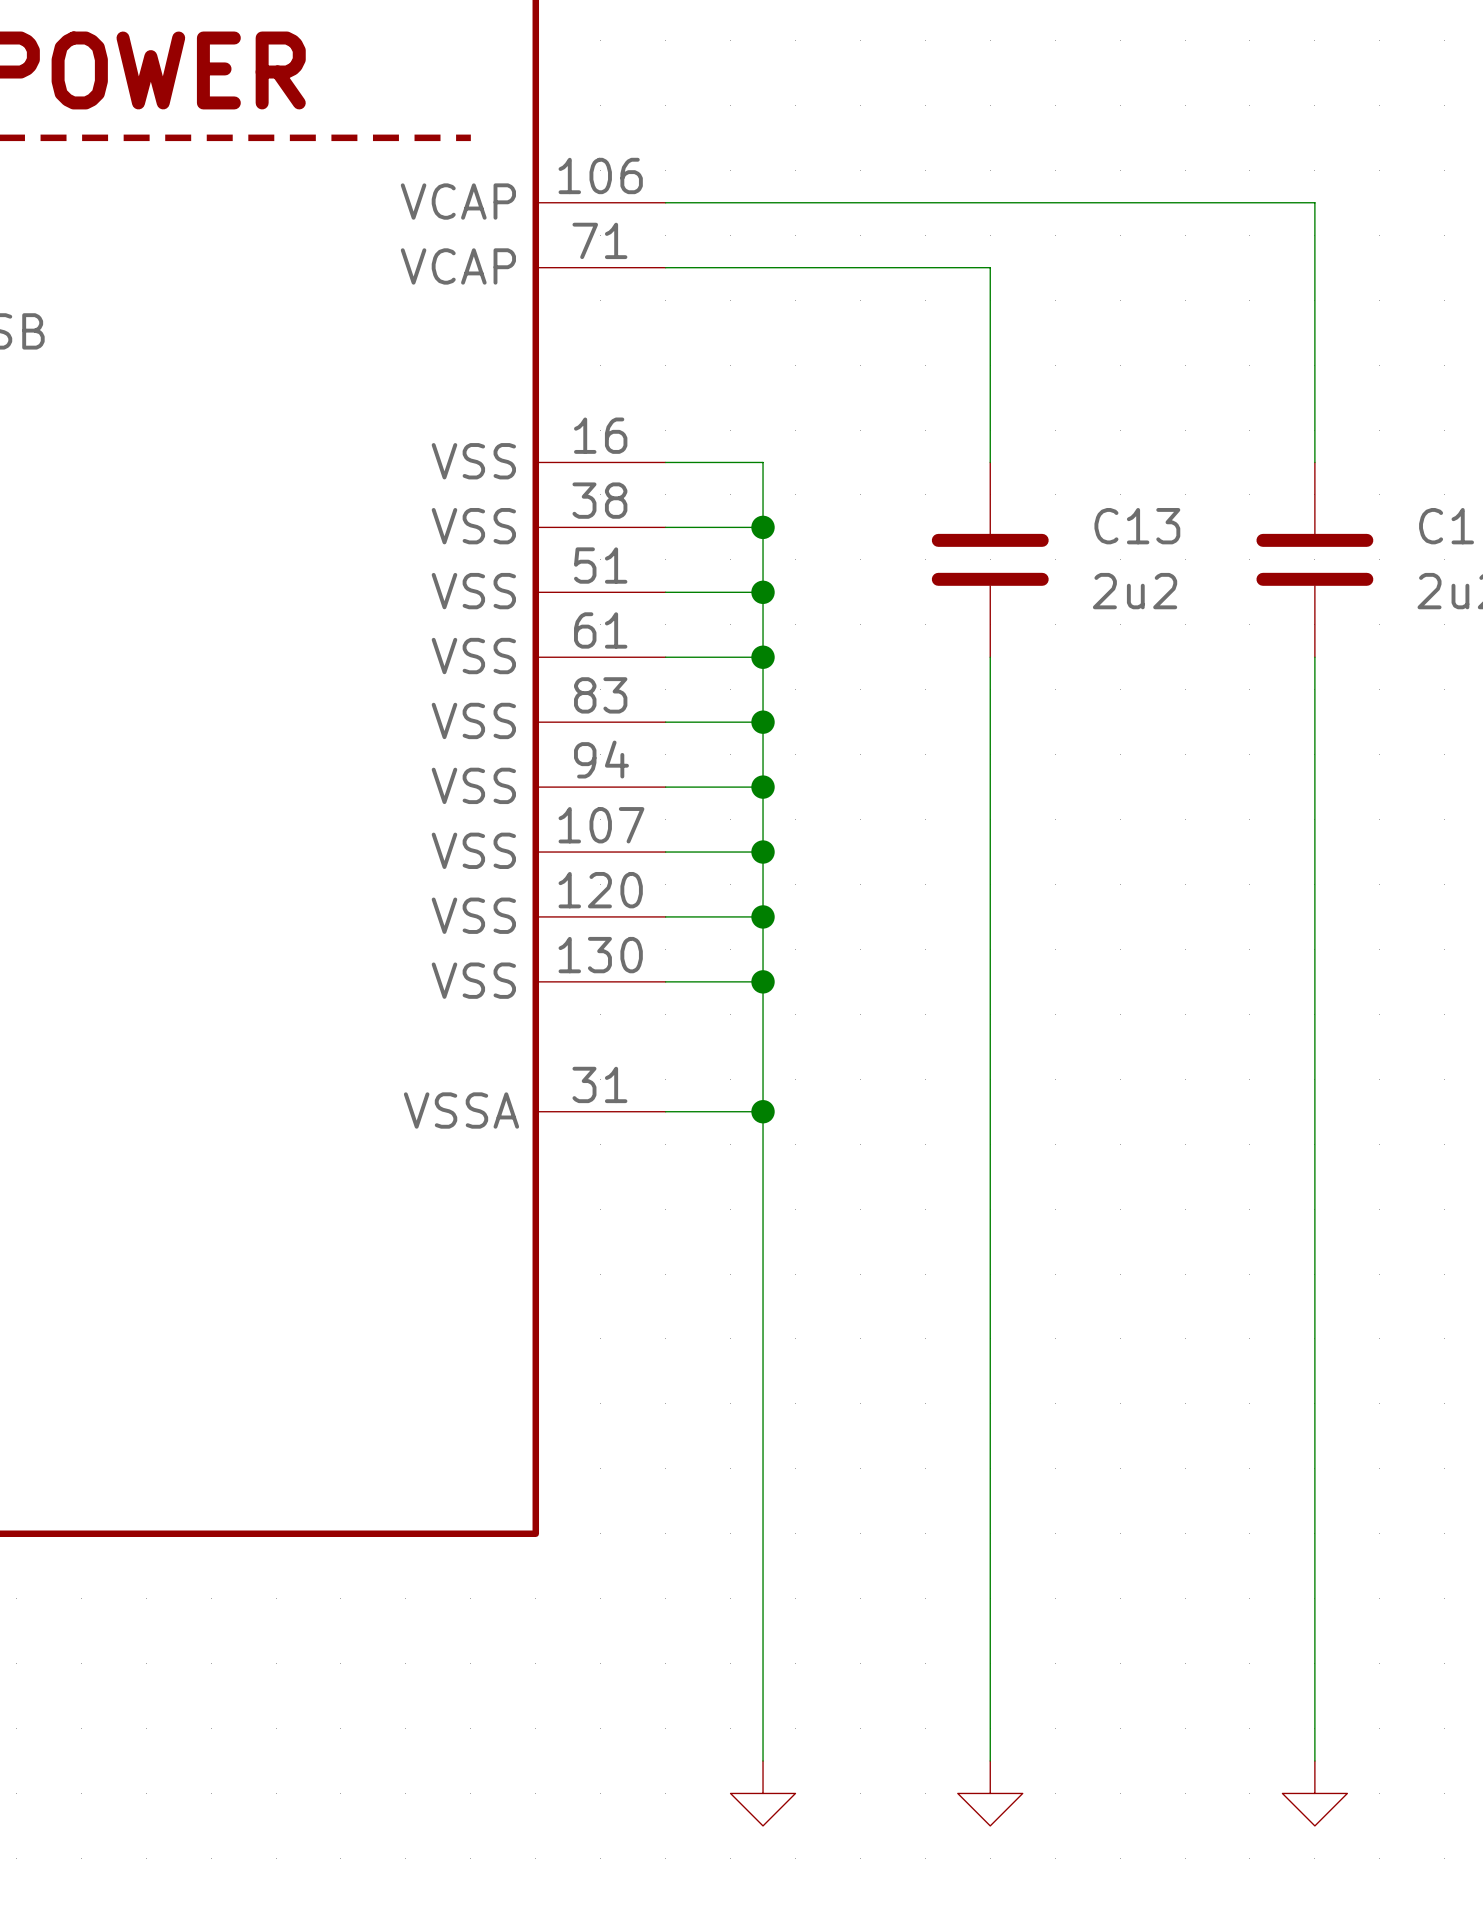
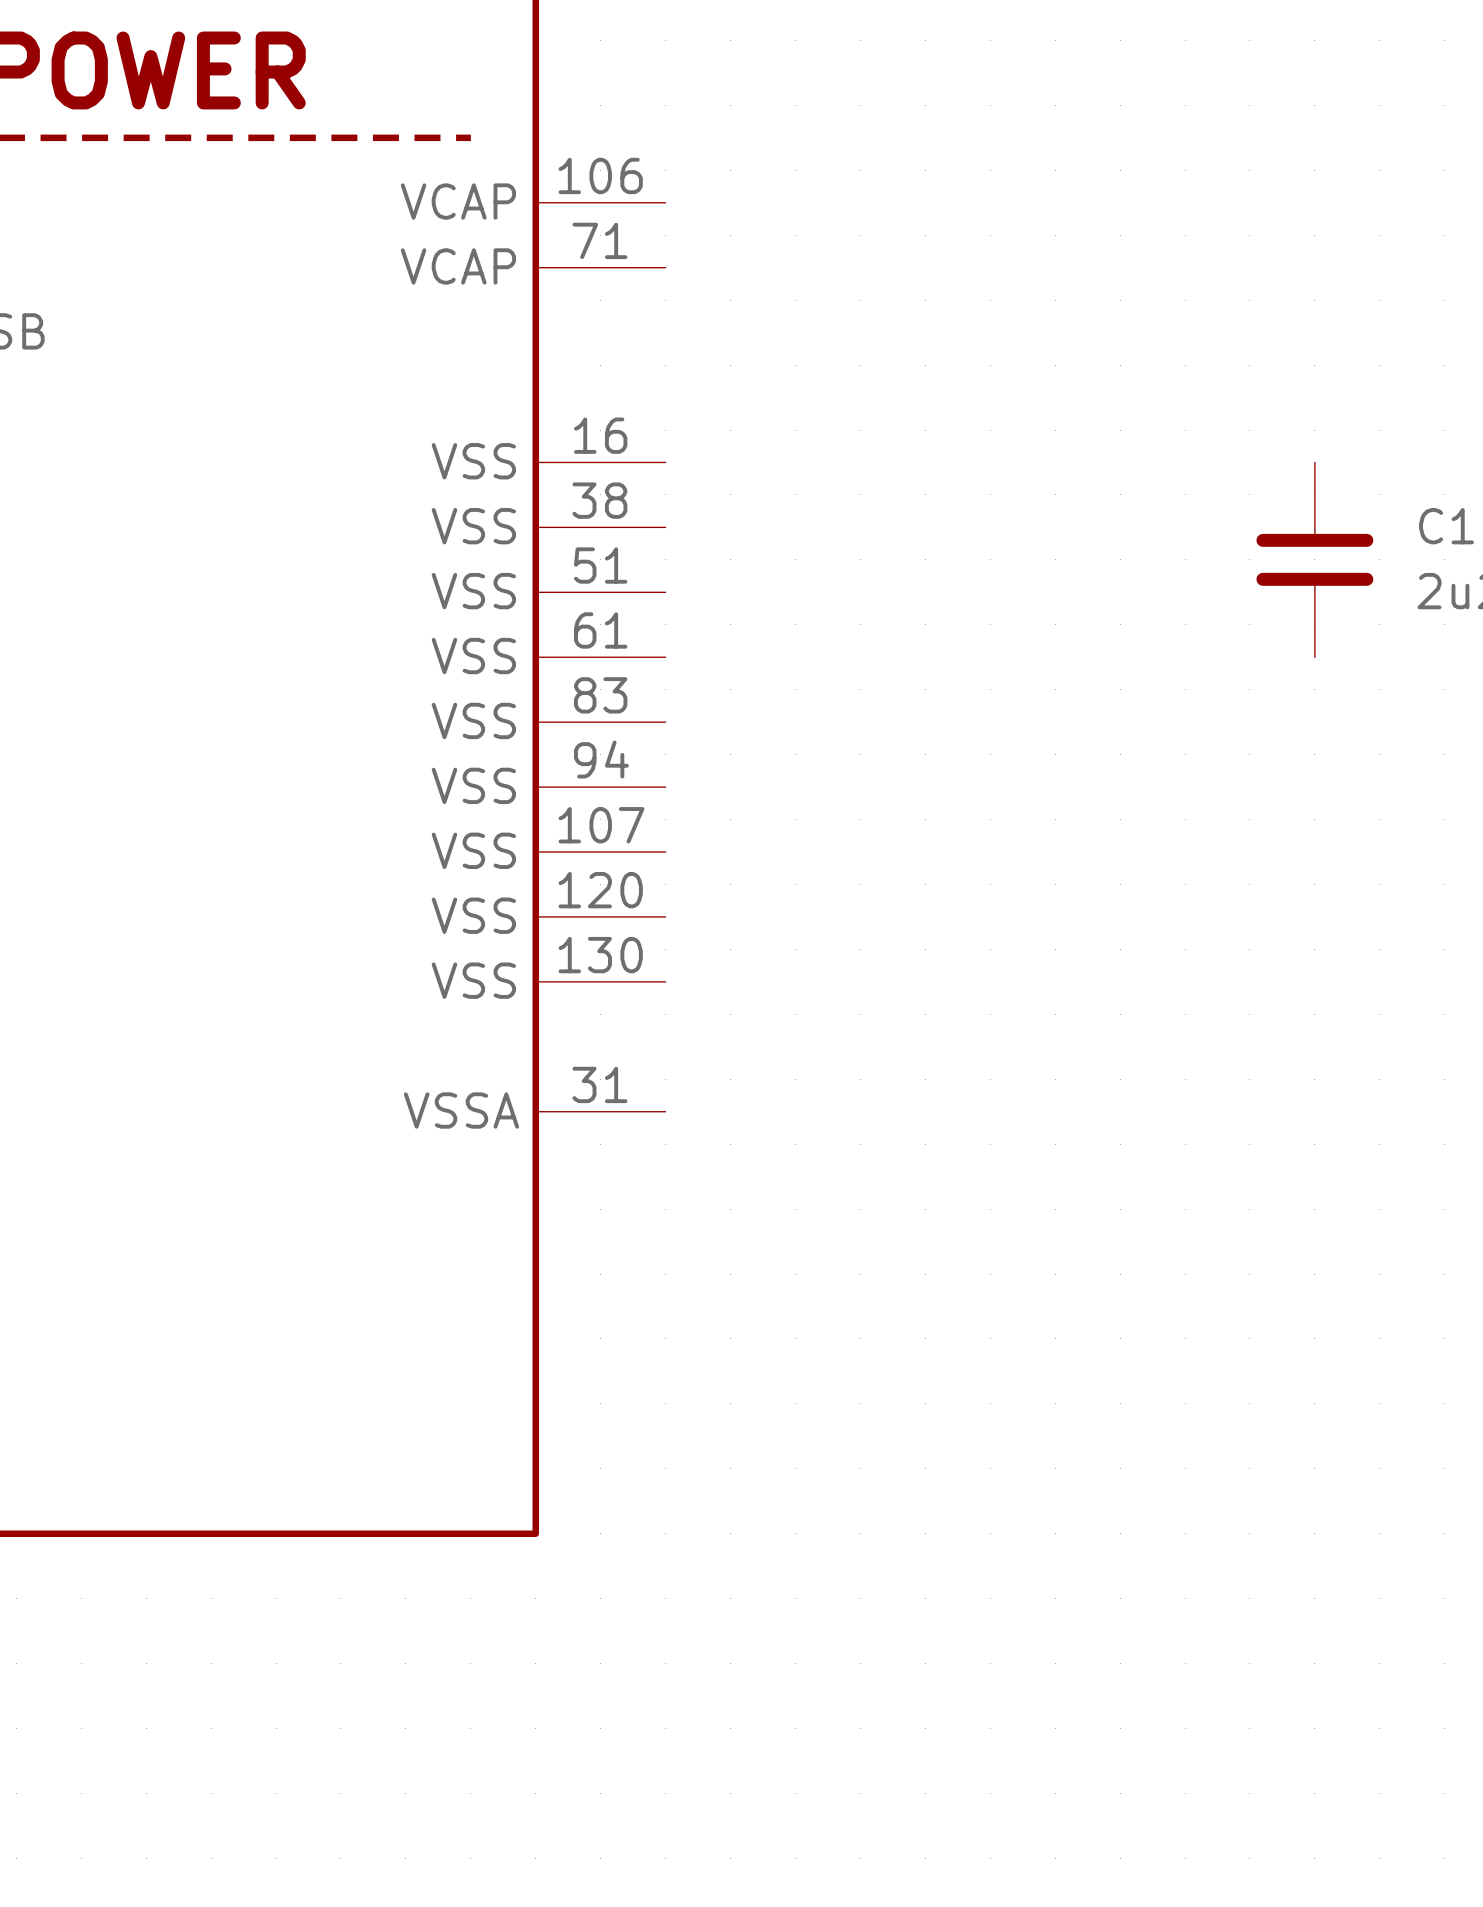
wire: (665, 202) (1314, 202) (1314, 462) -> none
wire: (665, 267) (990, 267) (990, 462) -> none
wire: (665, 462) (763, 462) (763, 1760) -> none
wire: (665, 527) (763, 527) -> none
junction: (763, 527) -> none
C13: 2u2 (990, 559) -> none
wire: (665, 592) (763, 592) -> none
junction: (763, 592) -> none
wire: (665, 657) (763, 657) -> none
junction: (763, 657) -> none
wire: (990, 657) (990, 1760) -> none
wire: (1314, 657) (1314, 1760) -> none
wire: (665, 722) (763, 722) -> none
junction: (763, 722) -> none
wire: (665, 787) (763, 787) -> none
junction: (763, 787) -> none
wire: (665, 852) (763, 852) -> none
junction: (763, 852) -> none
wire: (665, 916) (763, 916) -> none
junction: (763, 916) -> none
wire: (665, 981) (763, 981) -> none
junction: (763, 981) -> none
wire: (665, 1111) (763, 1111) -> none
junction: (763, 1111) -> none
power symbol: (763, 1793) -> none
power symbol: (990, 1793) -> none
power symbol: (1314, 1793) -> none

